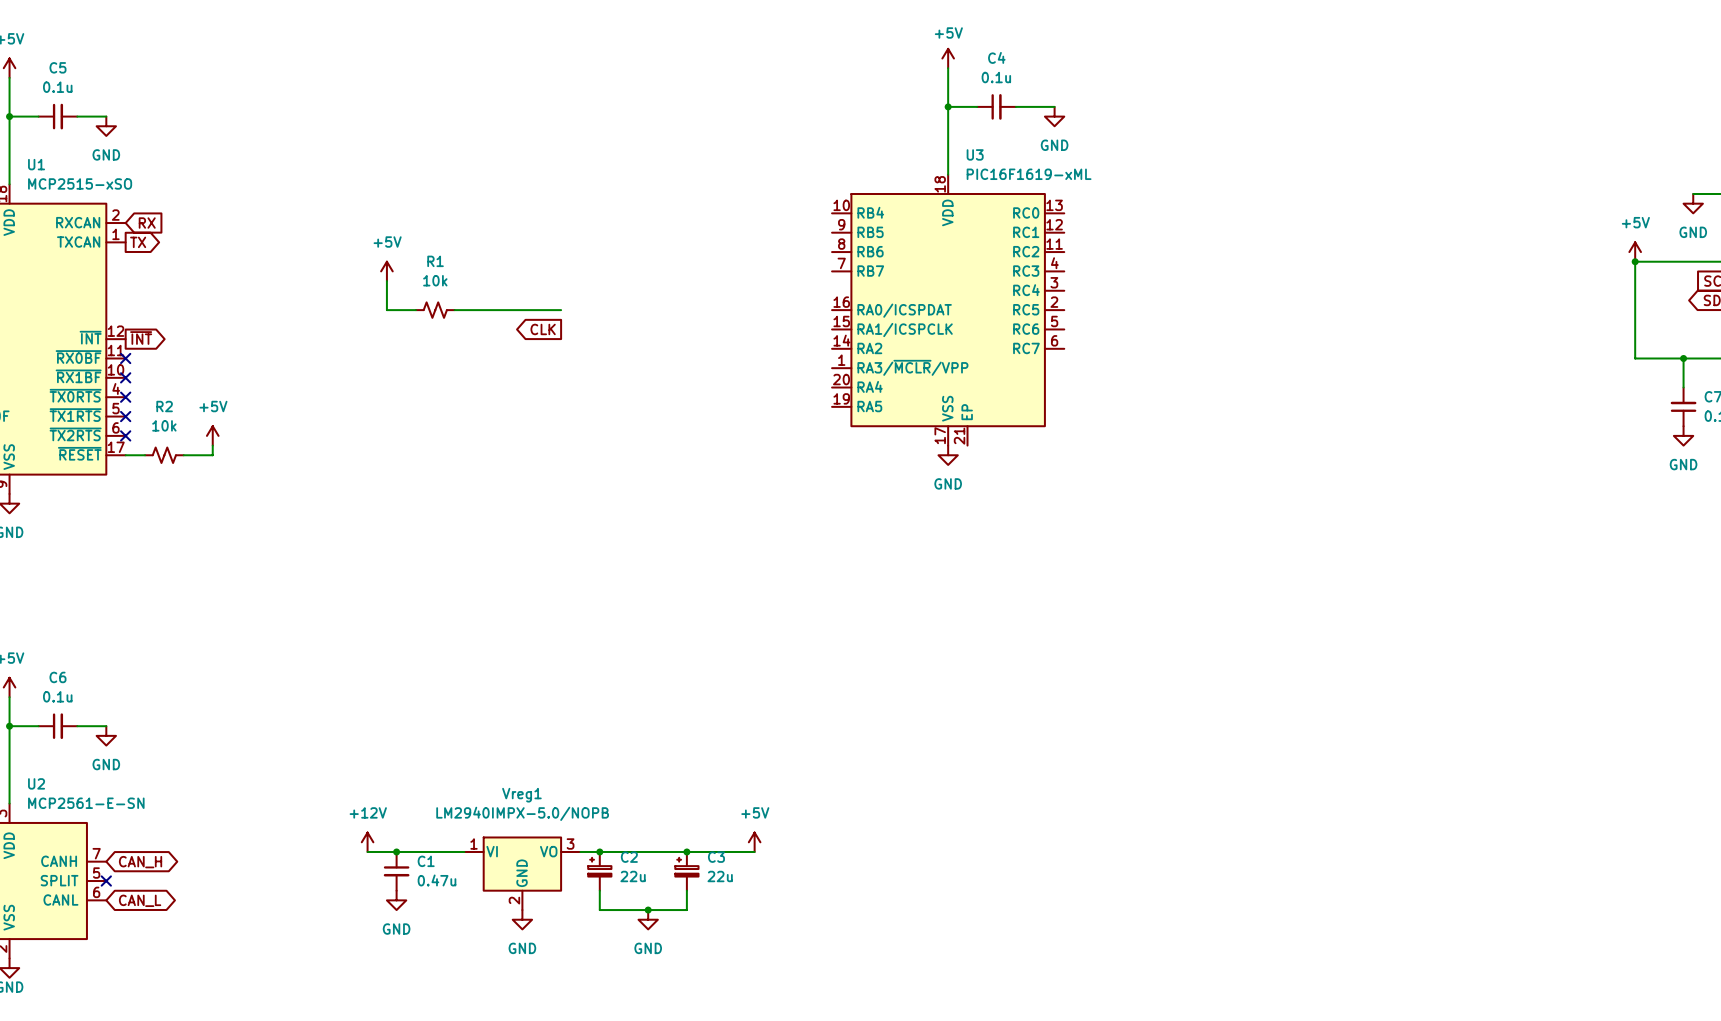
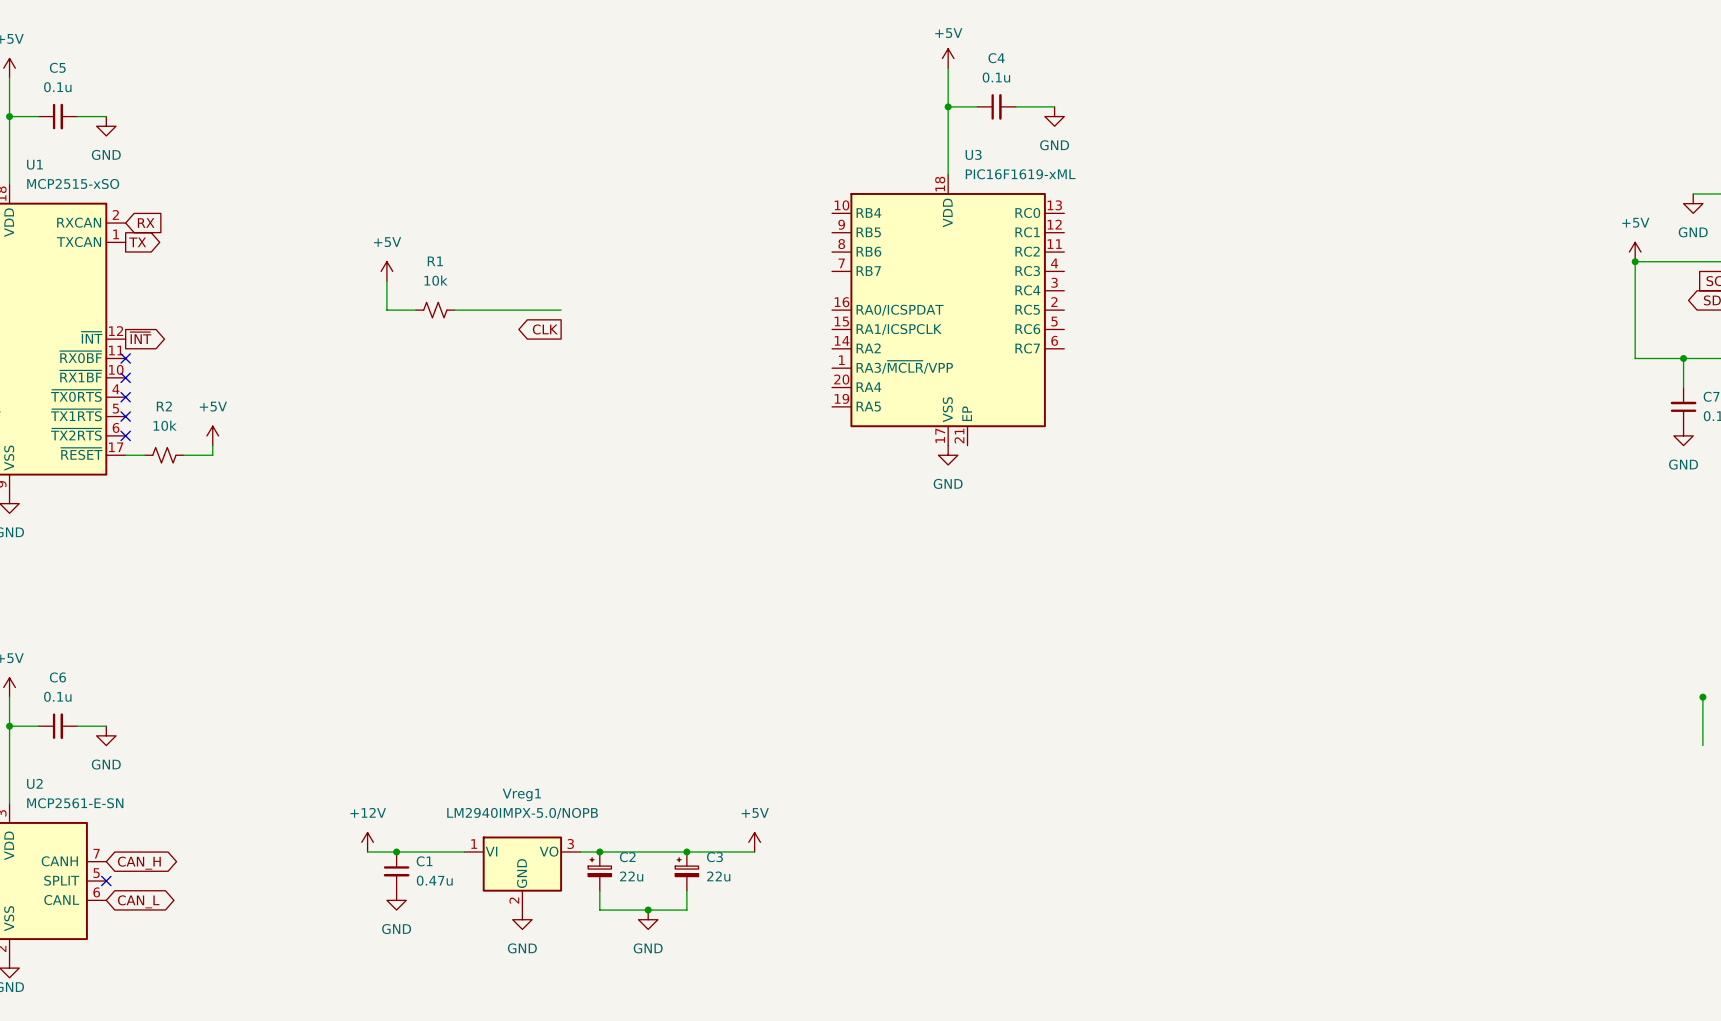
wire: none -> (1702, 697) (1702, 745)
junction: none -> (1702, 697)

